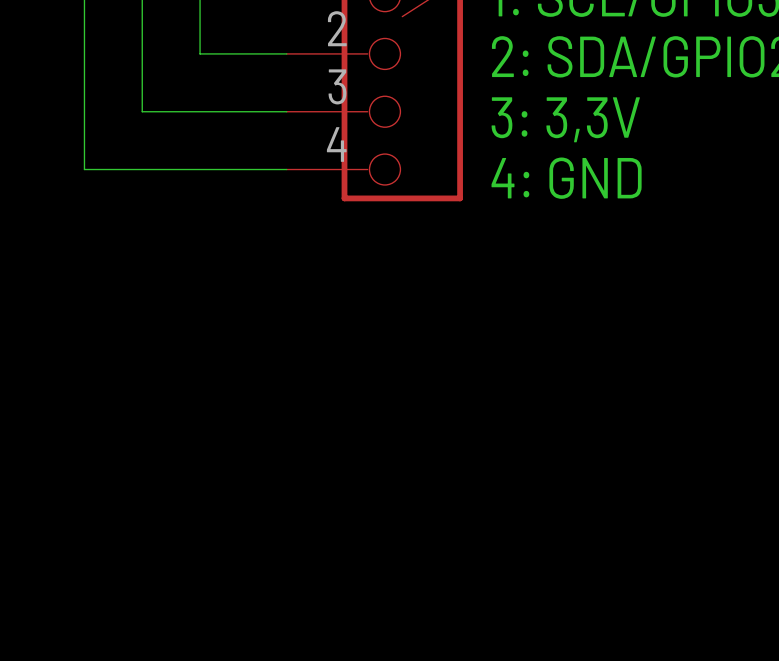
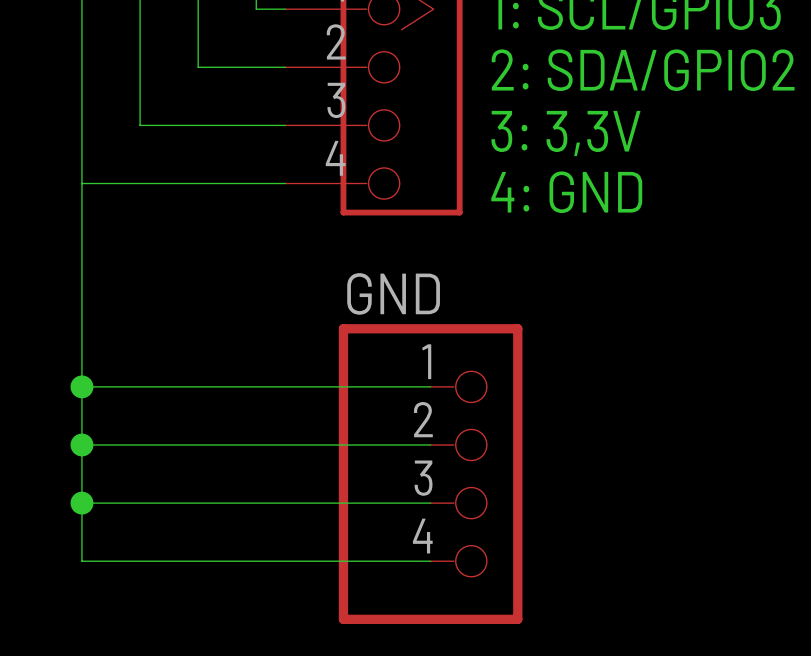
wire: none -> (81, 183) (81, 561) (430, 561)
wire: none -> (81, 386) (430, 386)
junction: none -> (81, 386)
wire: none -> (81, 445) (430, 445)
junction: none -> (81, 445)
GND: none -> (430, 474)
wire: none -> (81, 503) (430, 503)
junction: none -> (81, 503)

